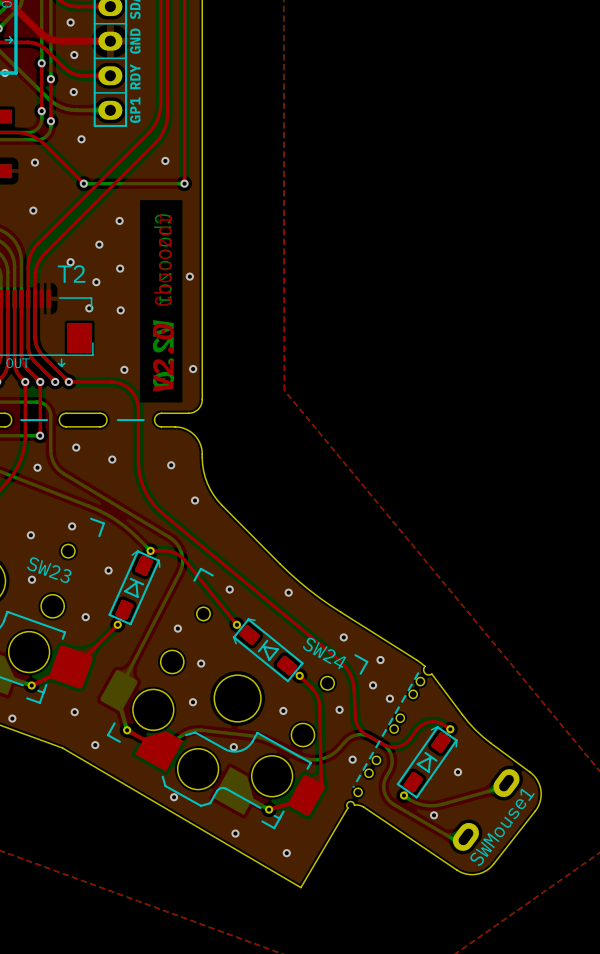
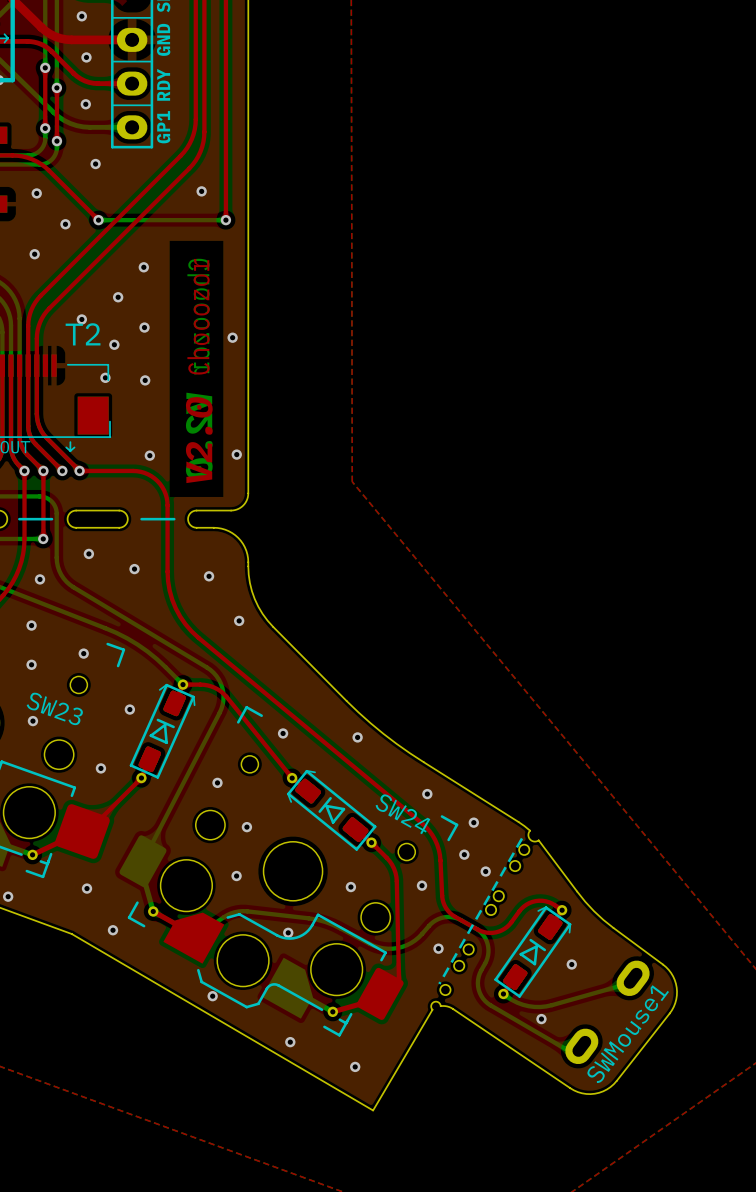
via: none -> (65, 224)
via: none -> (31, 625)

